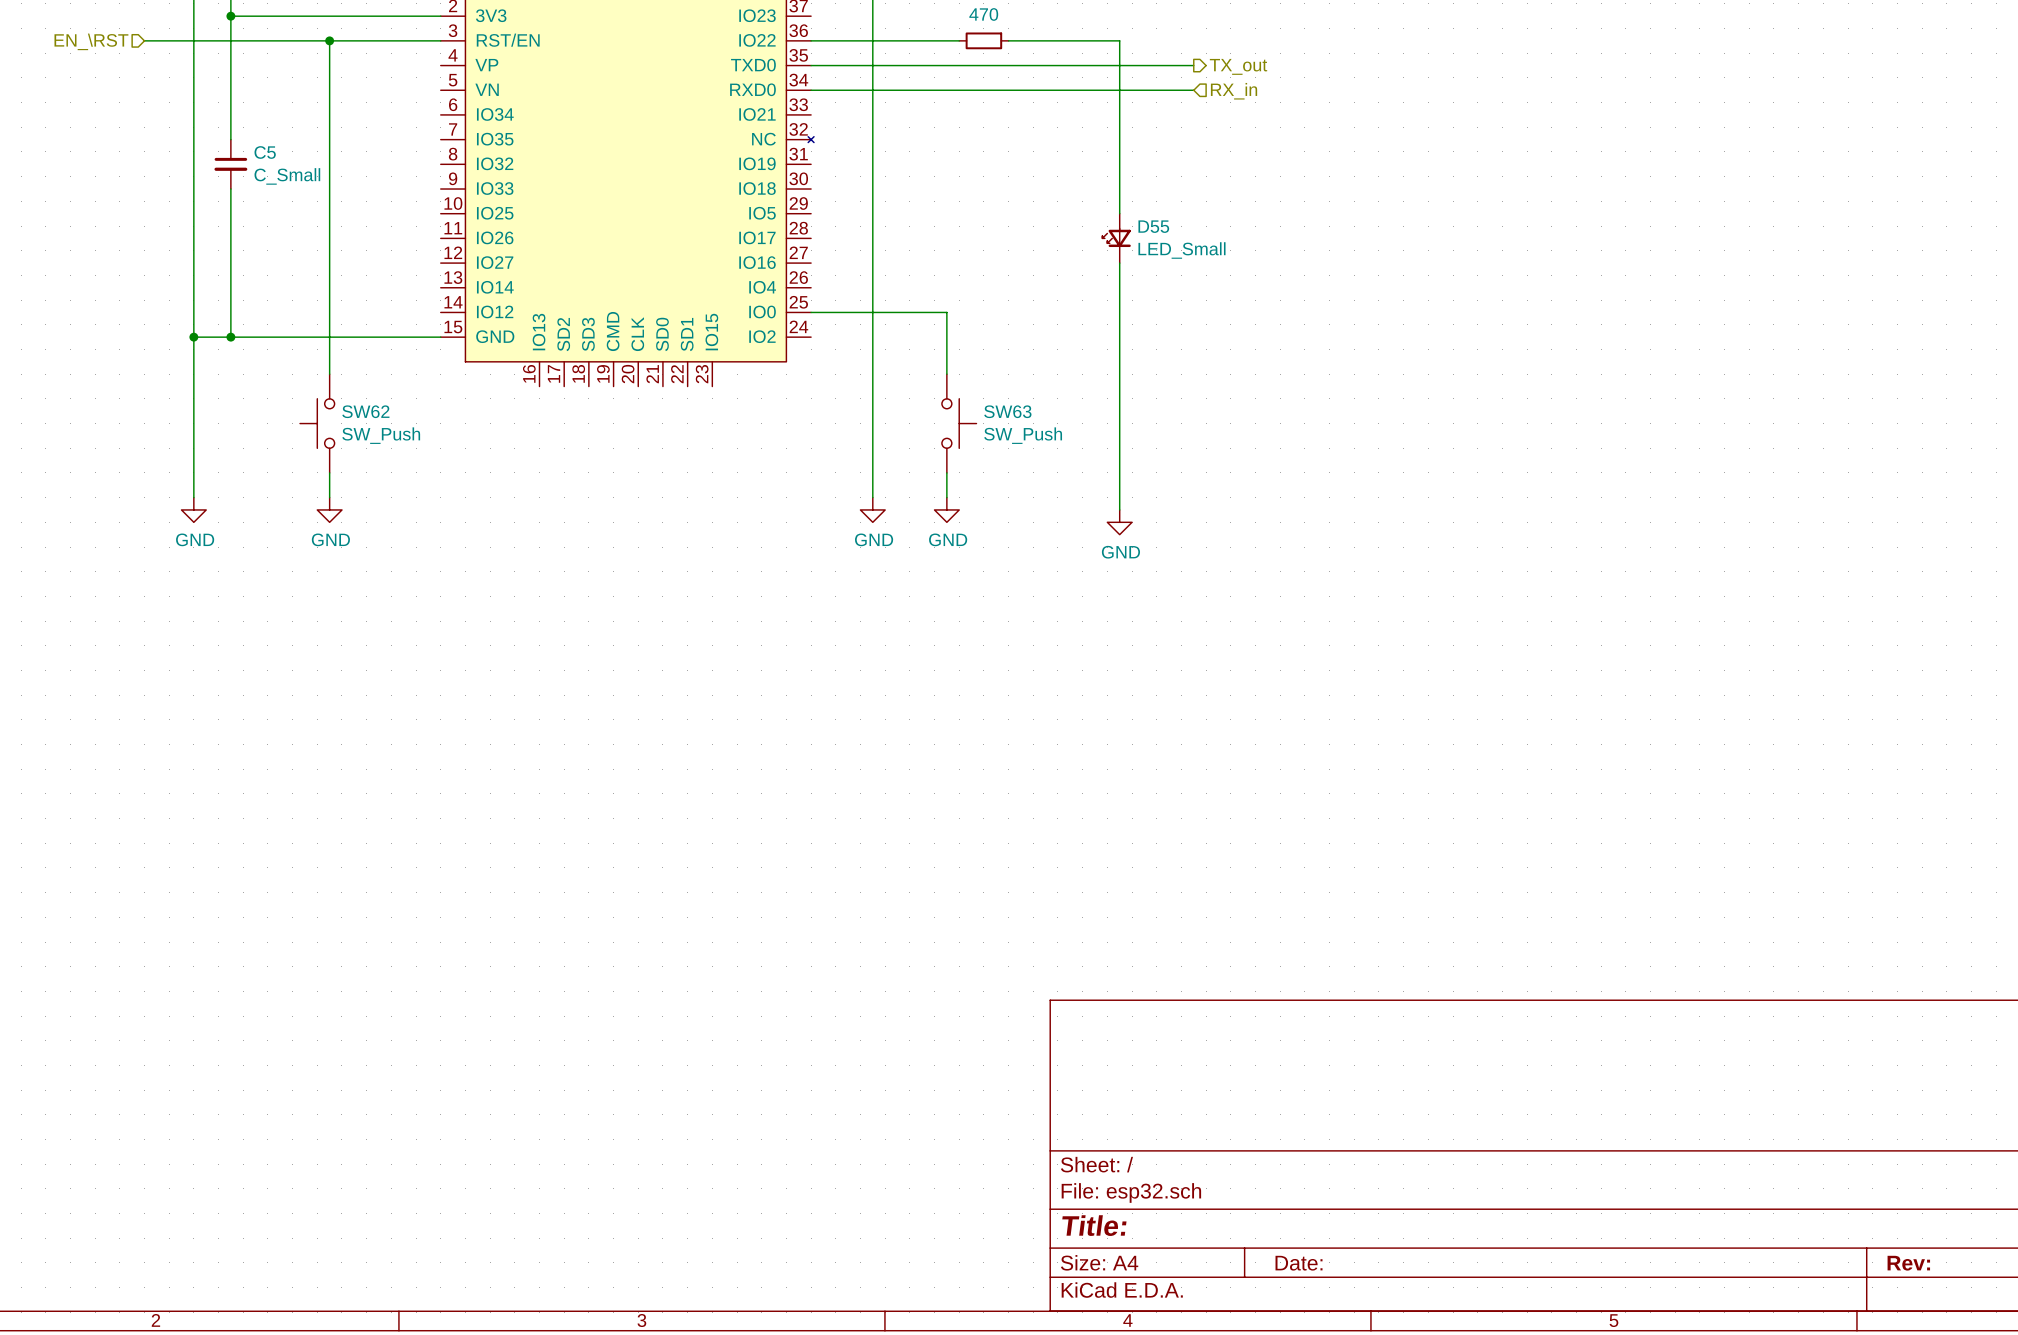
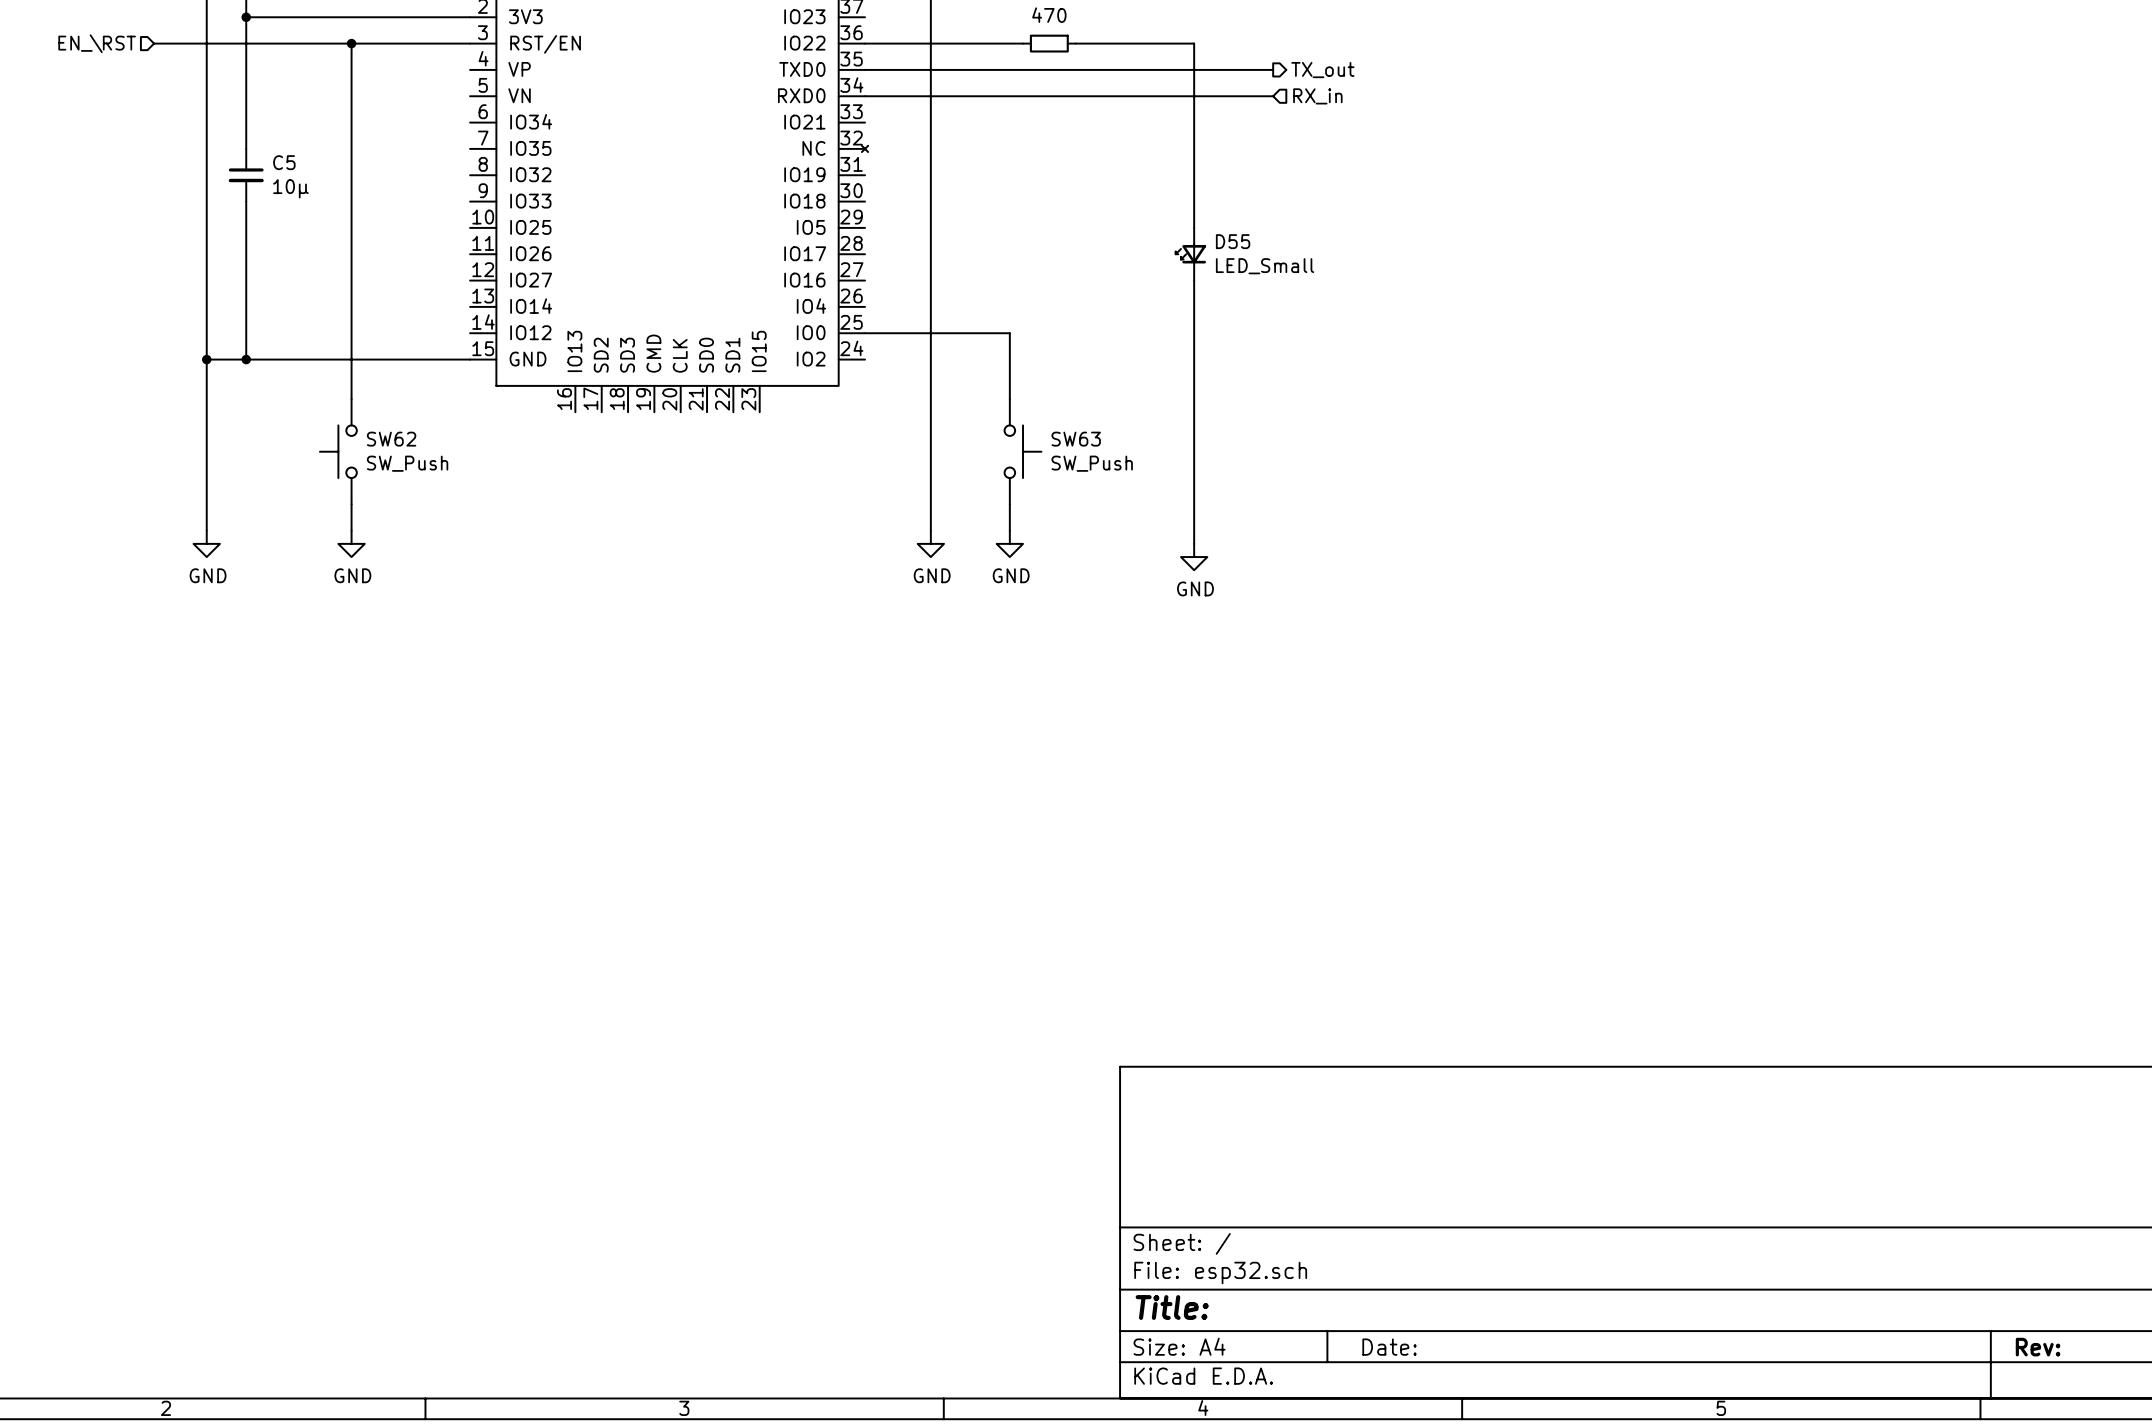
C5 value: C_Small (287, 176) -> 10μ (290, 188)

